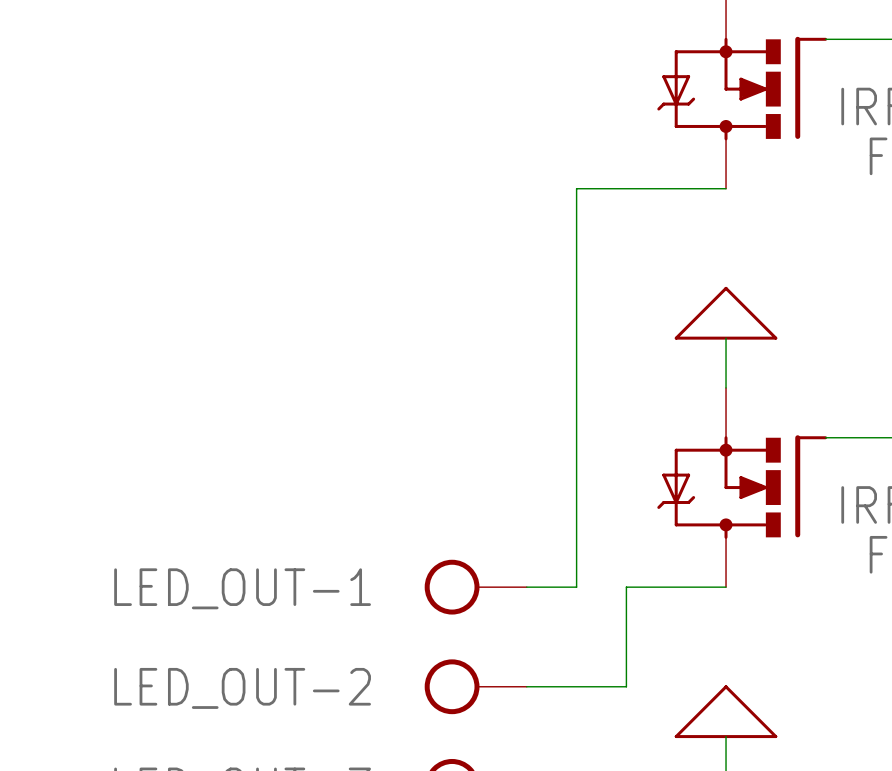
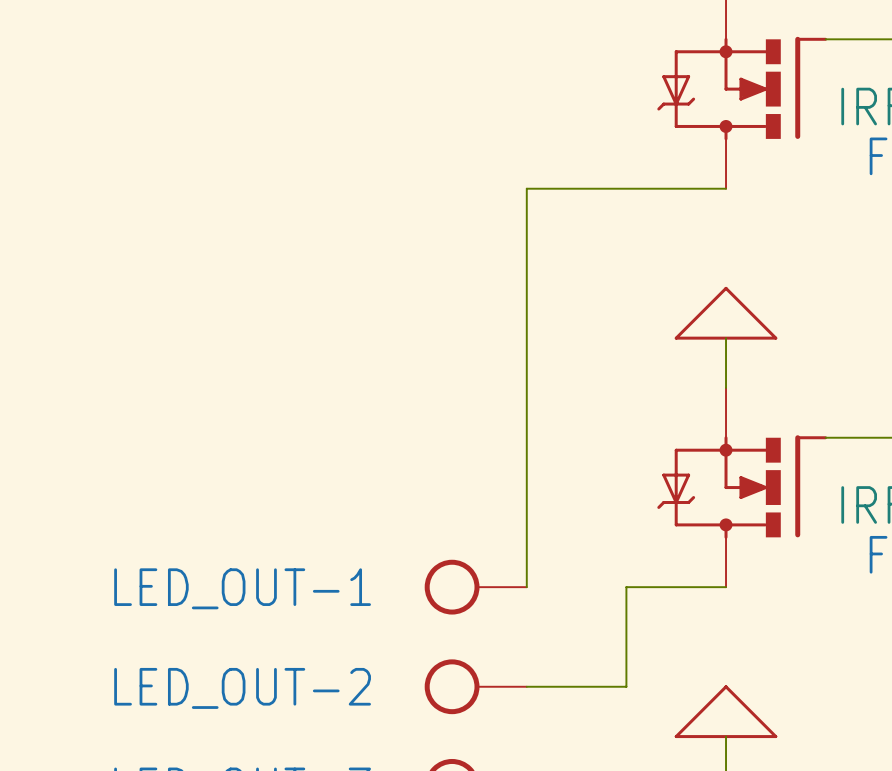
wire: (576, 188) (576, 587) (526, 587) -> (576, 188) (526, 188) (526, 587)

